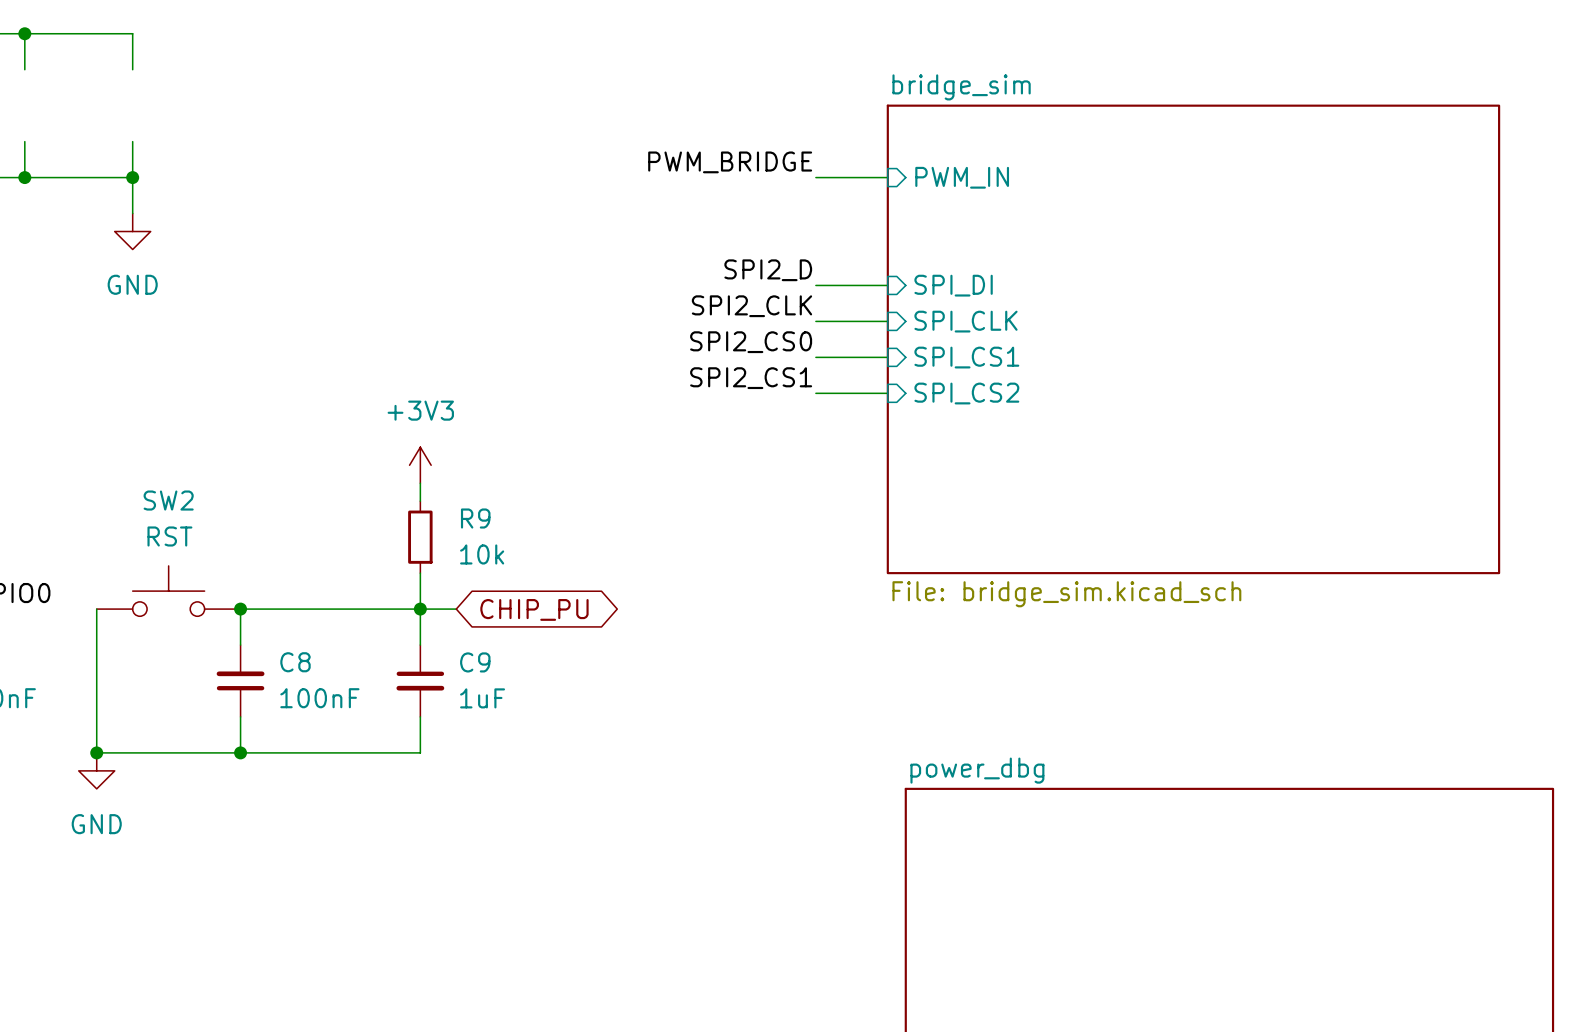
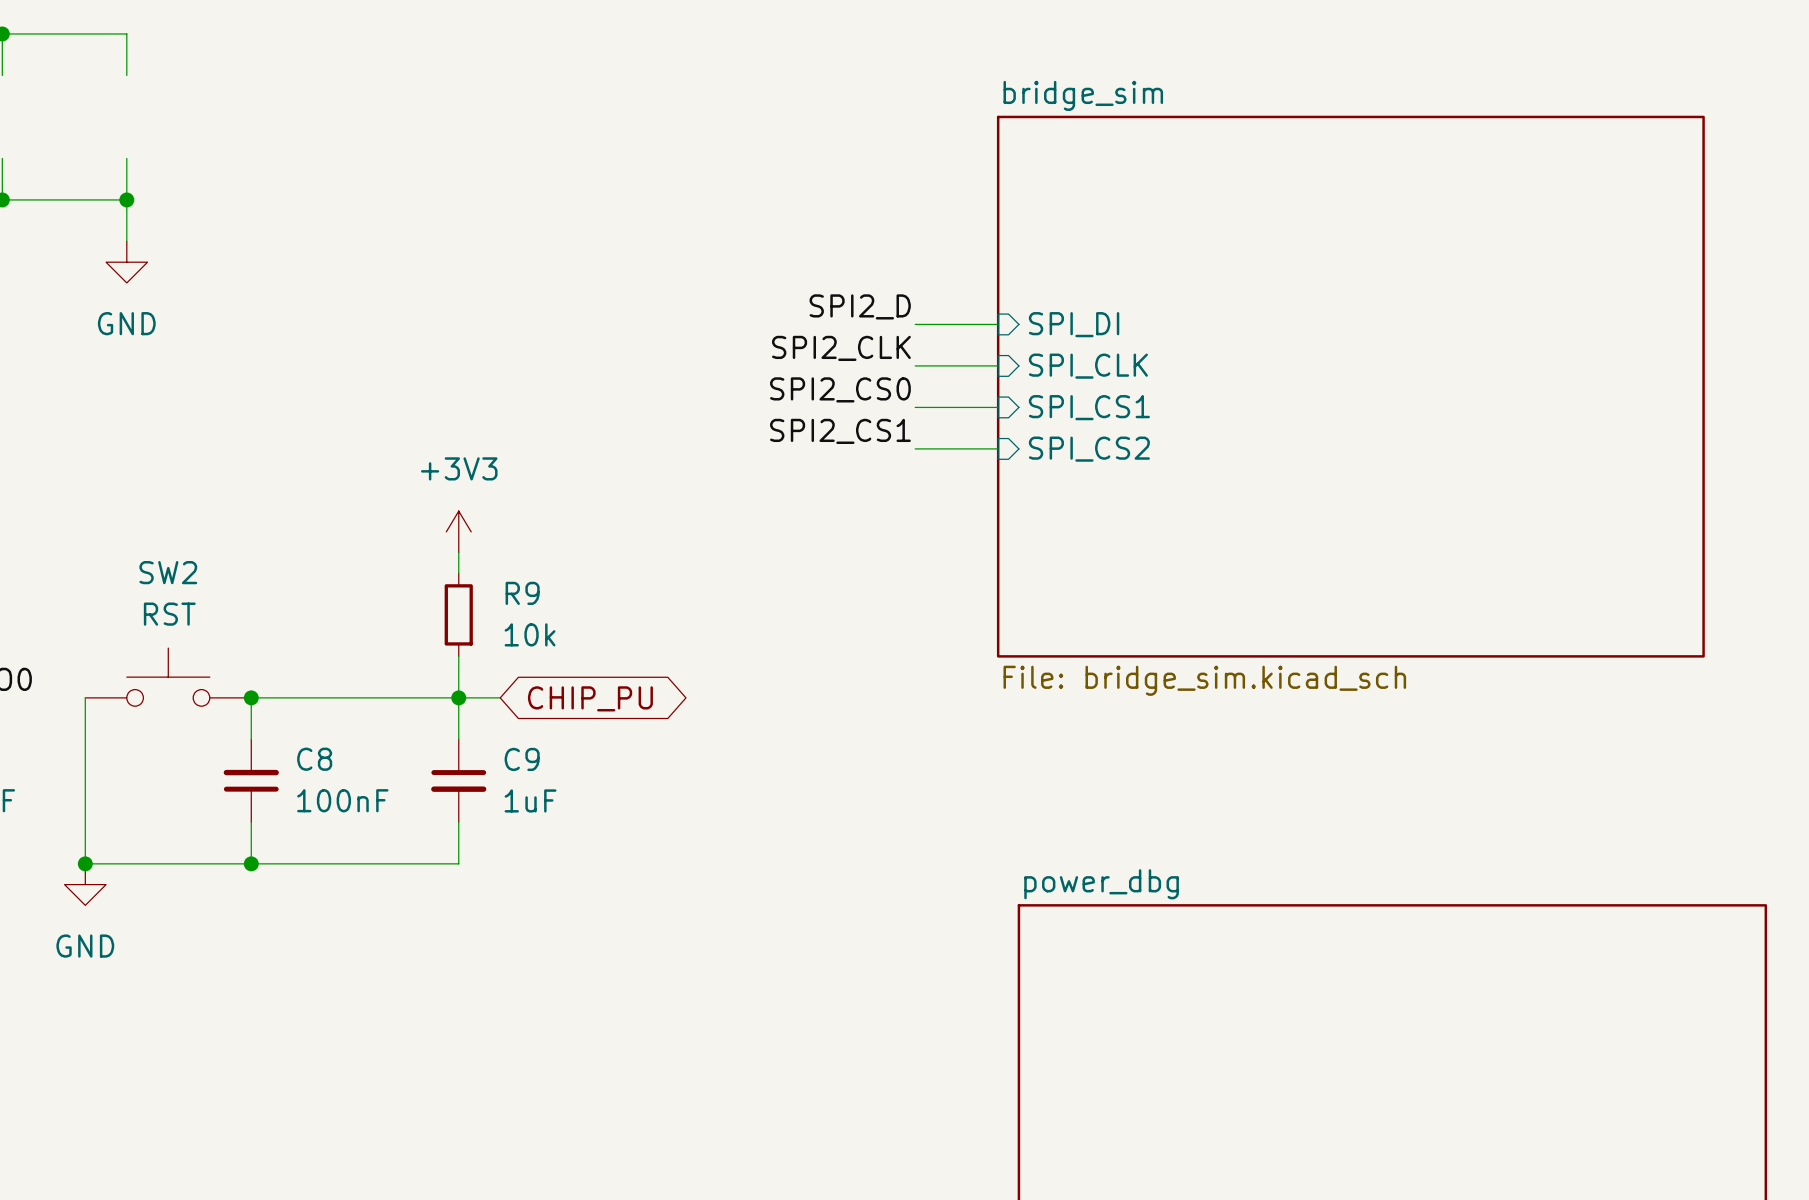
label: PWM_BRIDGE (730, 162) -> none
wire: (815, 177) (887, 177) -> none
sheet pin: PWM_IN (962, 177) -> none

